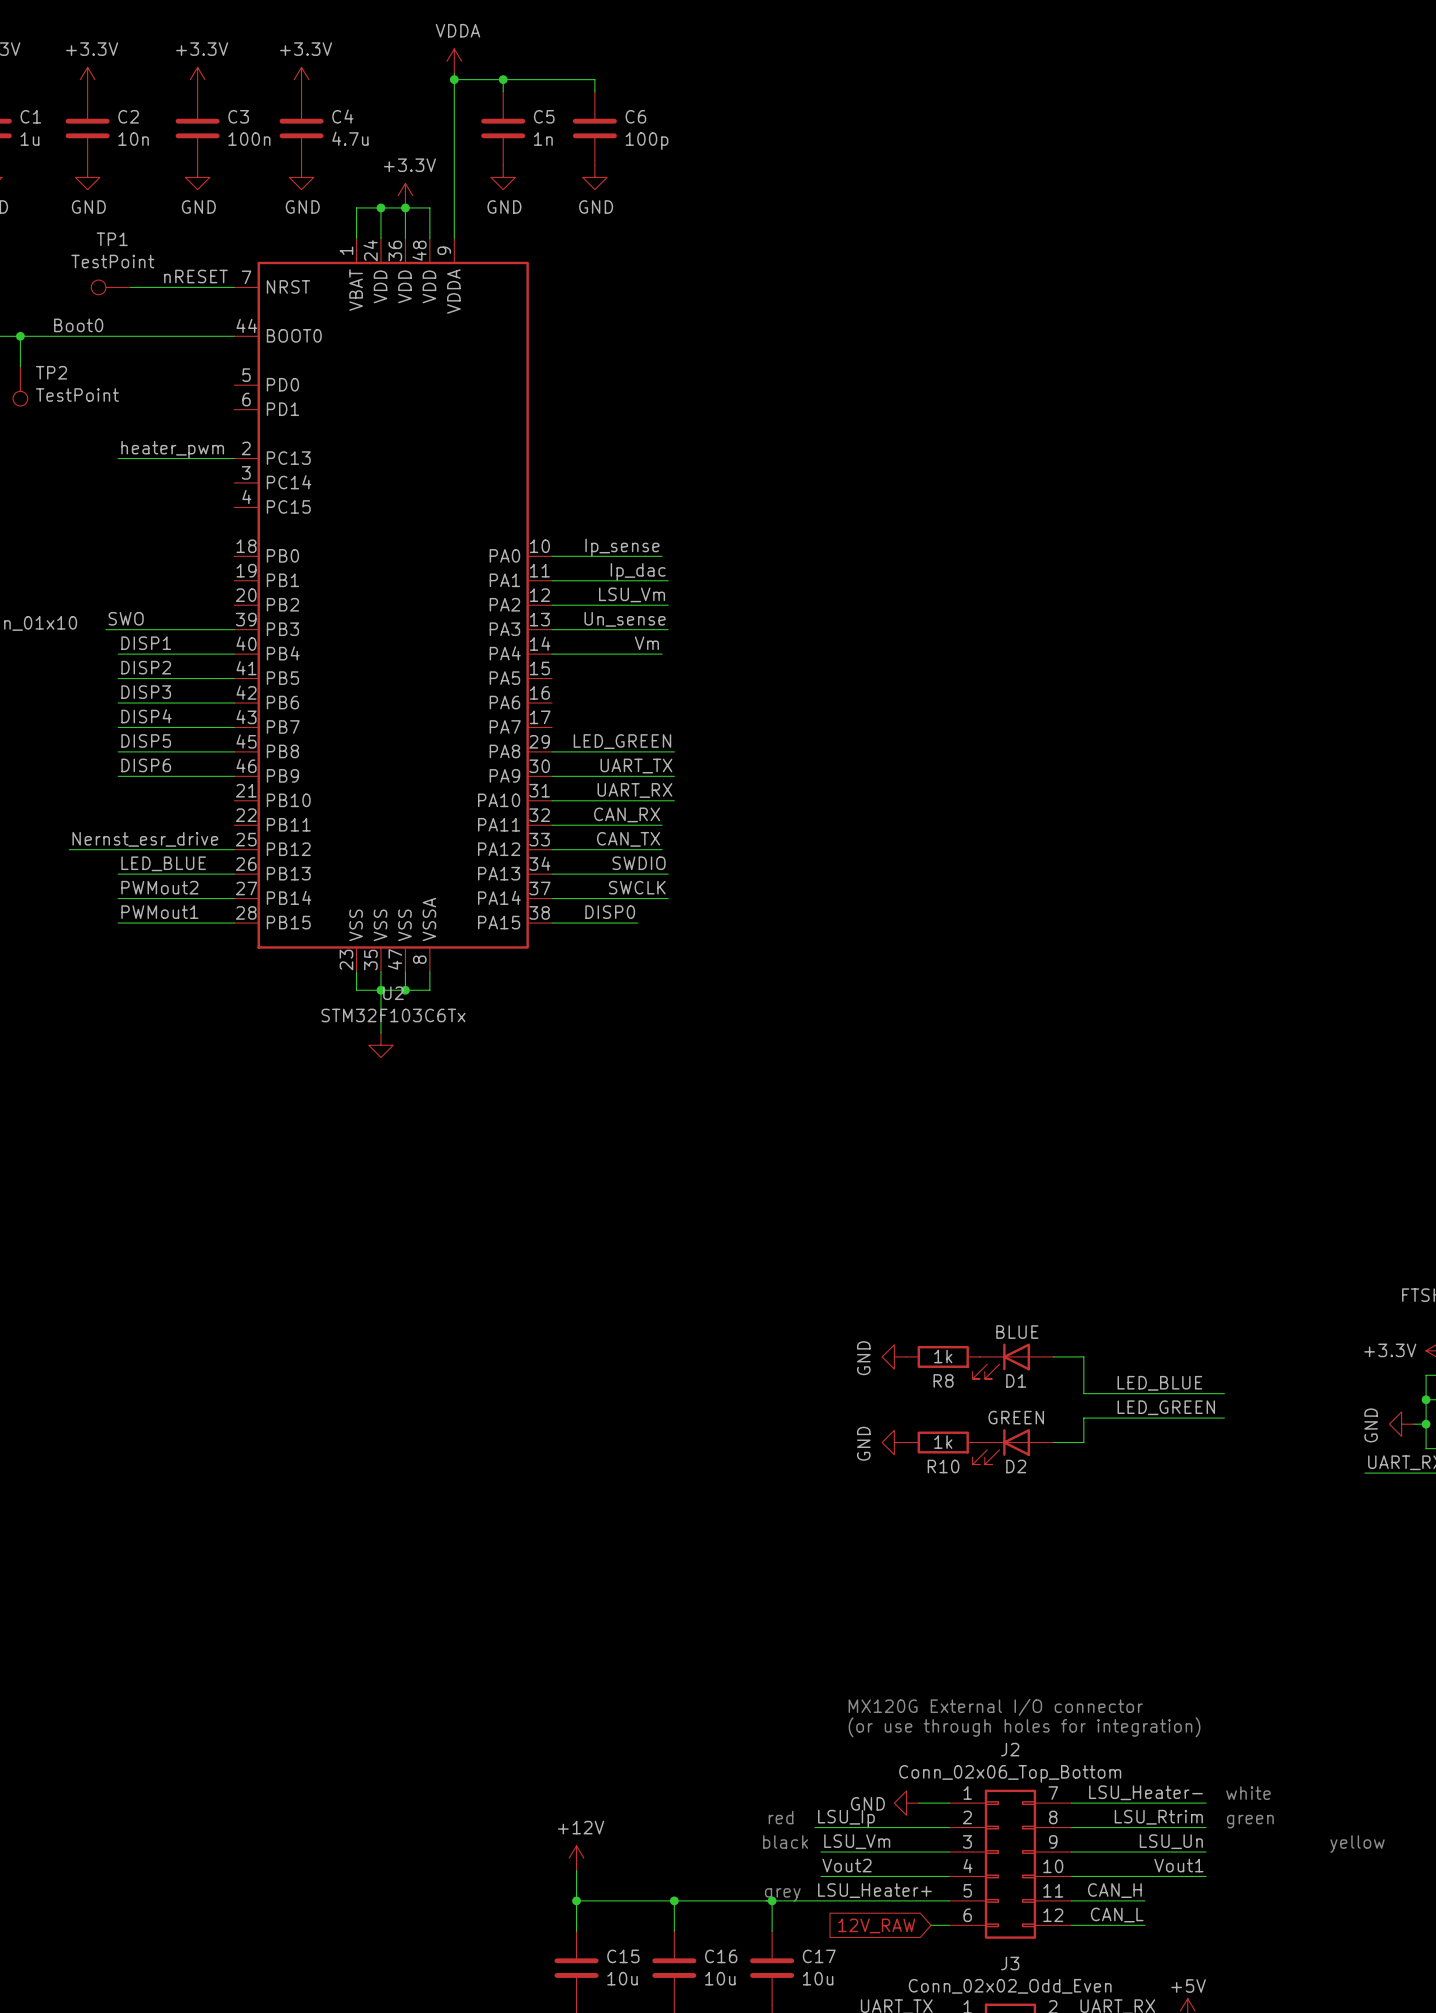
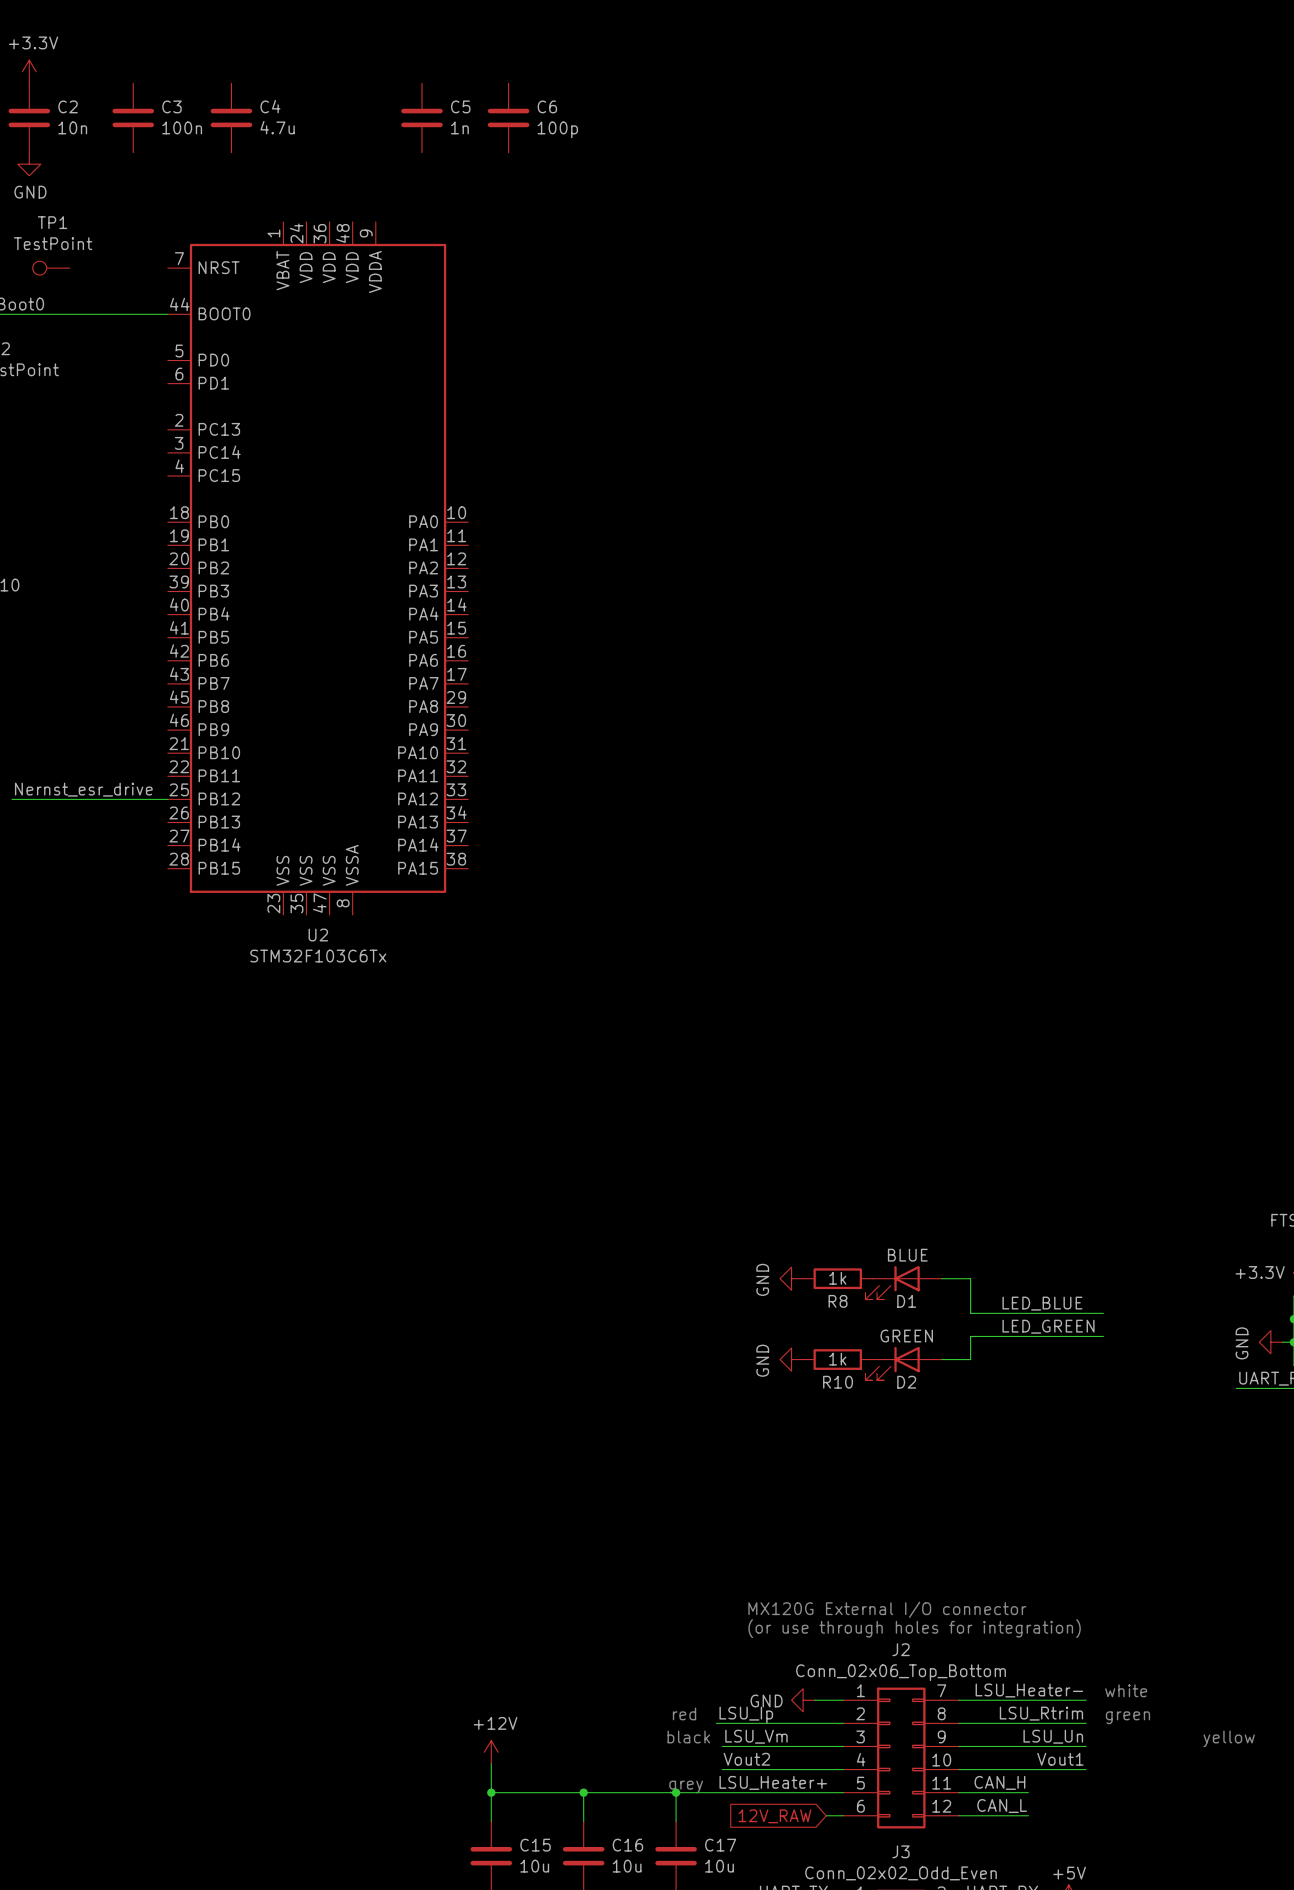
power symbol: VDDA (454, 61) -> none
wire: (454, 73) (454, 238) -> none
power symbol: +3.3V (197, 79) -> none
power symbol: +3.3V (301, 79) -> none
wire: (454, 79) (594, 79) (594, 91) -> none
junction: (454, 79) -> none
wire: (503, 79) (503, 91) -> none
junction: (503, 79) -> none
power symbol: GND (197, 177) -> none
power symbol: GND (301, 177) -> none
power symbol: GND (503, 177) -> none
power symbol: GND (594, 177) -> none
power symbol: +3.3V (405, 195) -> none
wire: (380, 207) (380, 238) -> none
junction: (380, 207) -> none
wire: (405, 207) (405, 238) -> none
junction: (405, 207) -> none
wire: (356, 238) (356, 207) (429, 207) (429, 238) -> none
label: nRESET (195, 276) -> none
wire: (130, 287) (234, 287) -> none
label: heater_pwm (172, 449) -> none
wire: (118, 458) (234, 458) -> none
label: Ip_sense (622, 547) -> none
wire: (552, 556) (662, 556) -> none
label: Ip_dac (638, 571) -> none
wire: (552, 580) (668, 580) -> none
label: LSU_Vm (632, 594) -> none
wire: (552, 605) (668, 605) -> none
label: SWO (126, 618) -> none
label: Un_sense (625, 619) -> none
wire: (105, 629) (234, 629) -> none
wire: (552, 629) (668, 629) -> none
label: DISP1 (146, 643) -> none
label: Vm (646, 643) -> none
wire: (118, 654) (234, 654) -> none
wire: (552, 654) (662, 654) -> none
label: DISP2 (146, 667) -> none
wire: (118, 678) (234, 678) -> none
label: DISP3 (146, 692) -> none
wire: (118, 703) (234, 703) -> none
label: DISP4 (146, 716) -> none
wire: (118, 727) (234, 727) -> none
label: DISP5 (146, 740) -> none
label: LED_GREEN (622, 741) -> none
wire: (118, 751) (234, 751) -> none
wire: (552, 751) (674, 751) -> none
label: DISP6 (146, 765) -> none
label: UART_TX (636, 766) -> none
wire: (118, 776) (234, 776) -> none
wire: (552, 776) (674, 776) -> none
label: UART_RX (634, 790) -> none
wire: (552, 800) (674, 800) -> none
label: CAN_RX (627, 814) -> none
wire: (552, 825) (662, 825) -> none
label: CAN_TX (628, 839) -> none
wire: (552, 849) (662, 849) -> none
label: LED_BLUE (163, 863) -> none
label: SWDIO (639, 863) -> none
wire: (118, 874) (234, 874) -> none
wire: (552, 874) (668, 874) -> none
label: PWMout2 (159, 887) -> none
label: SWCLK (637, 887) -> none
wire: (118, 898) (234, 898) -> none
wire: (552, 898) (668, 898) -> none
label: PWMout1 (159, 912) -> none
label: DISP0 (610, 912) -> none
wire: (118, 923) (234, 923) -> none
wire: (552, 923) (637, 923) -> none
wire: (356, 971) (356, 990) (429, 990) (429, 971) -> none
wire: (380, 971) (380, 1033) -> none
wire: (405, 971) (405, 990) -> none
junction: (380, 990) -> none
junction: (405, 990) -> none
power symbol: (380, 1045) -> none

